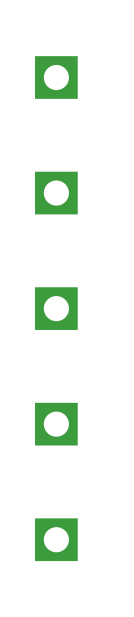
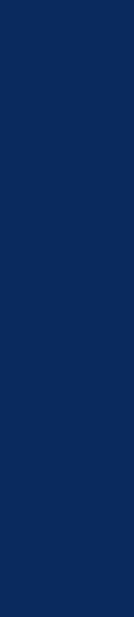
part: (56, 77) -> none
part: (56, 193) -> none
part: (56, 308) -> none
part: (56, 424) -> none
part: (56, 539) -> none

